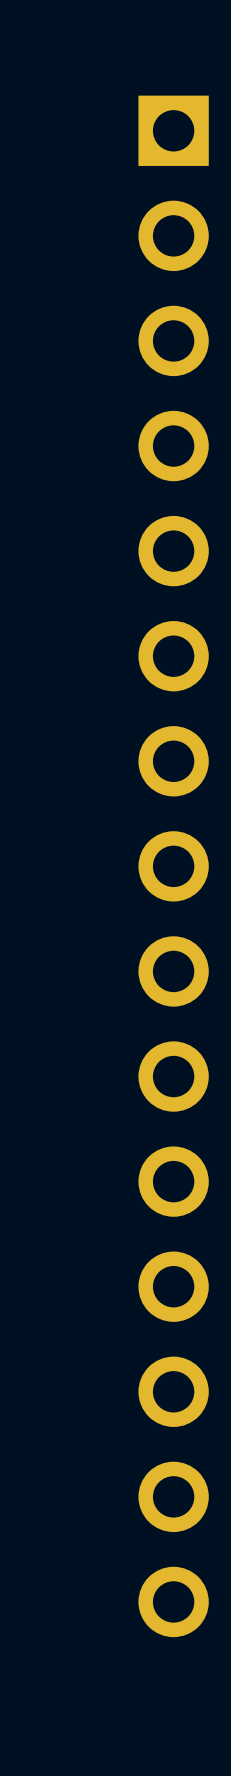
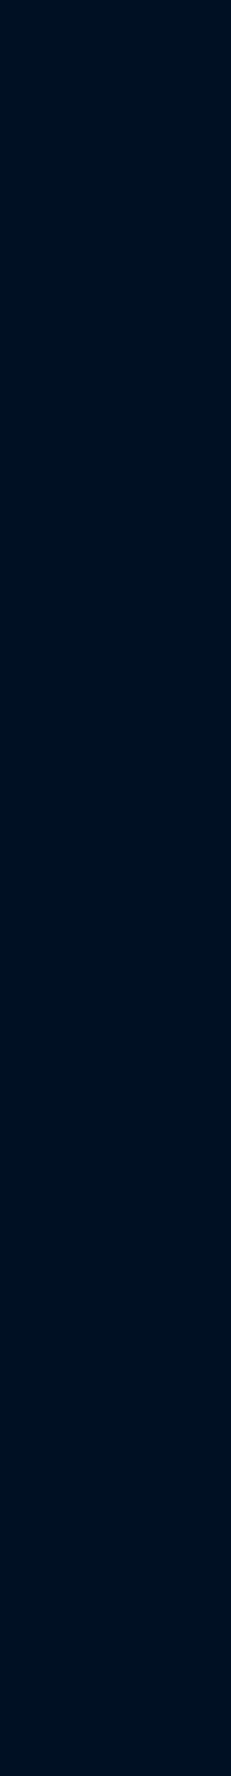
part: (173, 866) -> none

